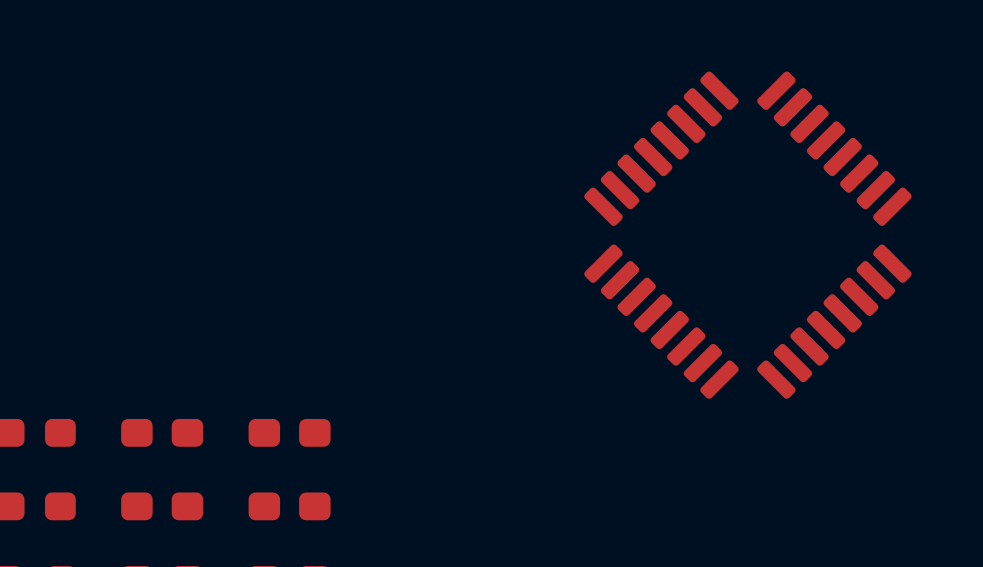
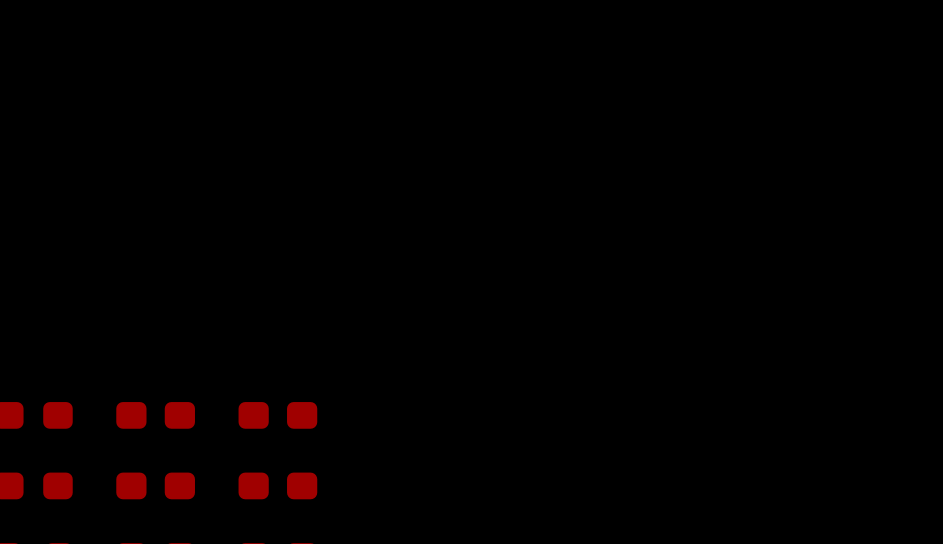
part: (747, 235) -> none

